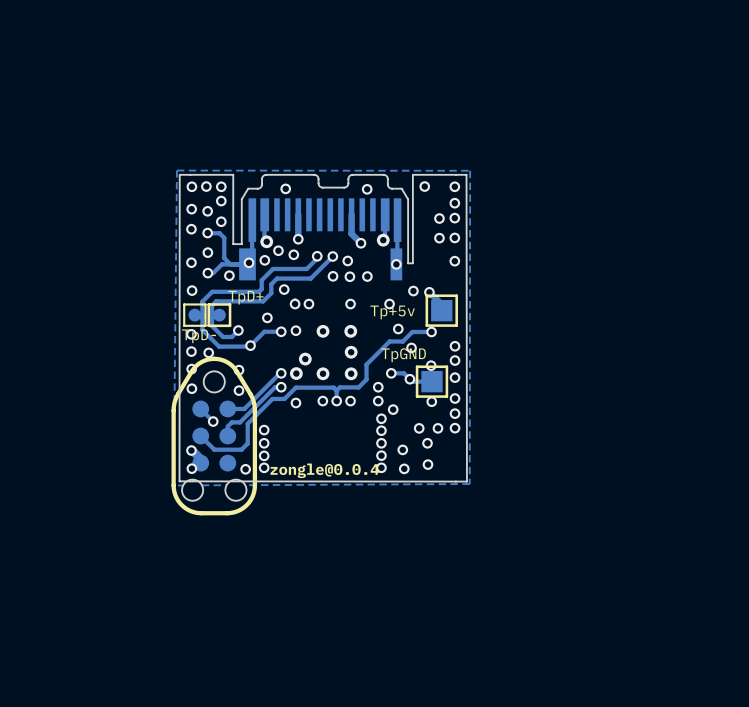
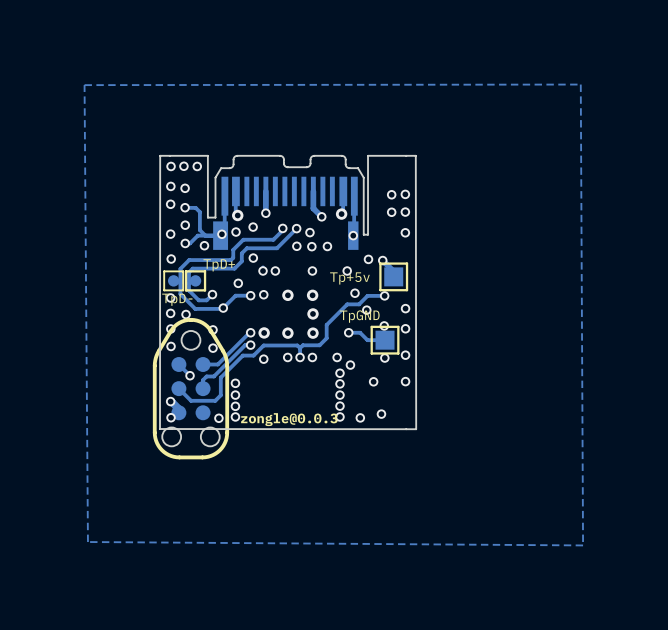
zone outline: none -> (580, 84) (583, 545) (87, 542) (84, 85) (580, 84)
zone outline: (176, 170) (173, 485) (469, 484) (470, 170) (176, 170) -> none
via: (424, 186) -> none
via: (454, 186) -> none
via: (285, 188) -> none
via: (367, 189) -> none
via: (221, 201) -> none
via: (454, 203) -> none
via: (221, 221) -> none
via: (278, 250) -> none
via: none -> (253, 227)
via: (293, 254) -> none
via: (305, 359) -> none
via: (455, 360) -> none
via: none -> (405, 328)
via: (455, 377) -> none
via: (409, 379) -> none
via: (378, 387) -> none
via: (455, 413) -> none
via: (437, 428) -> none
via: (427, 443) -> none
via: (402, 449) -> none
text: zongle@0.0.4 (324, 470) -> zongle@0.0.3 (289, 419)

